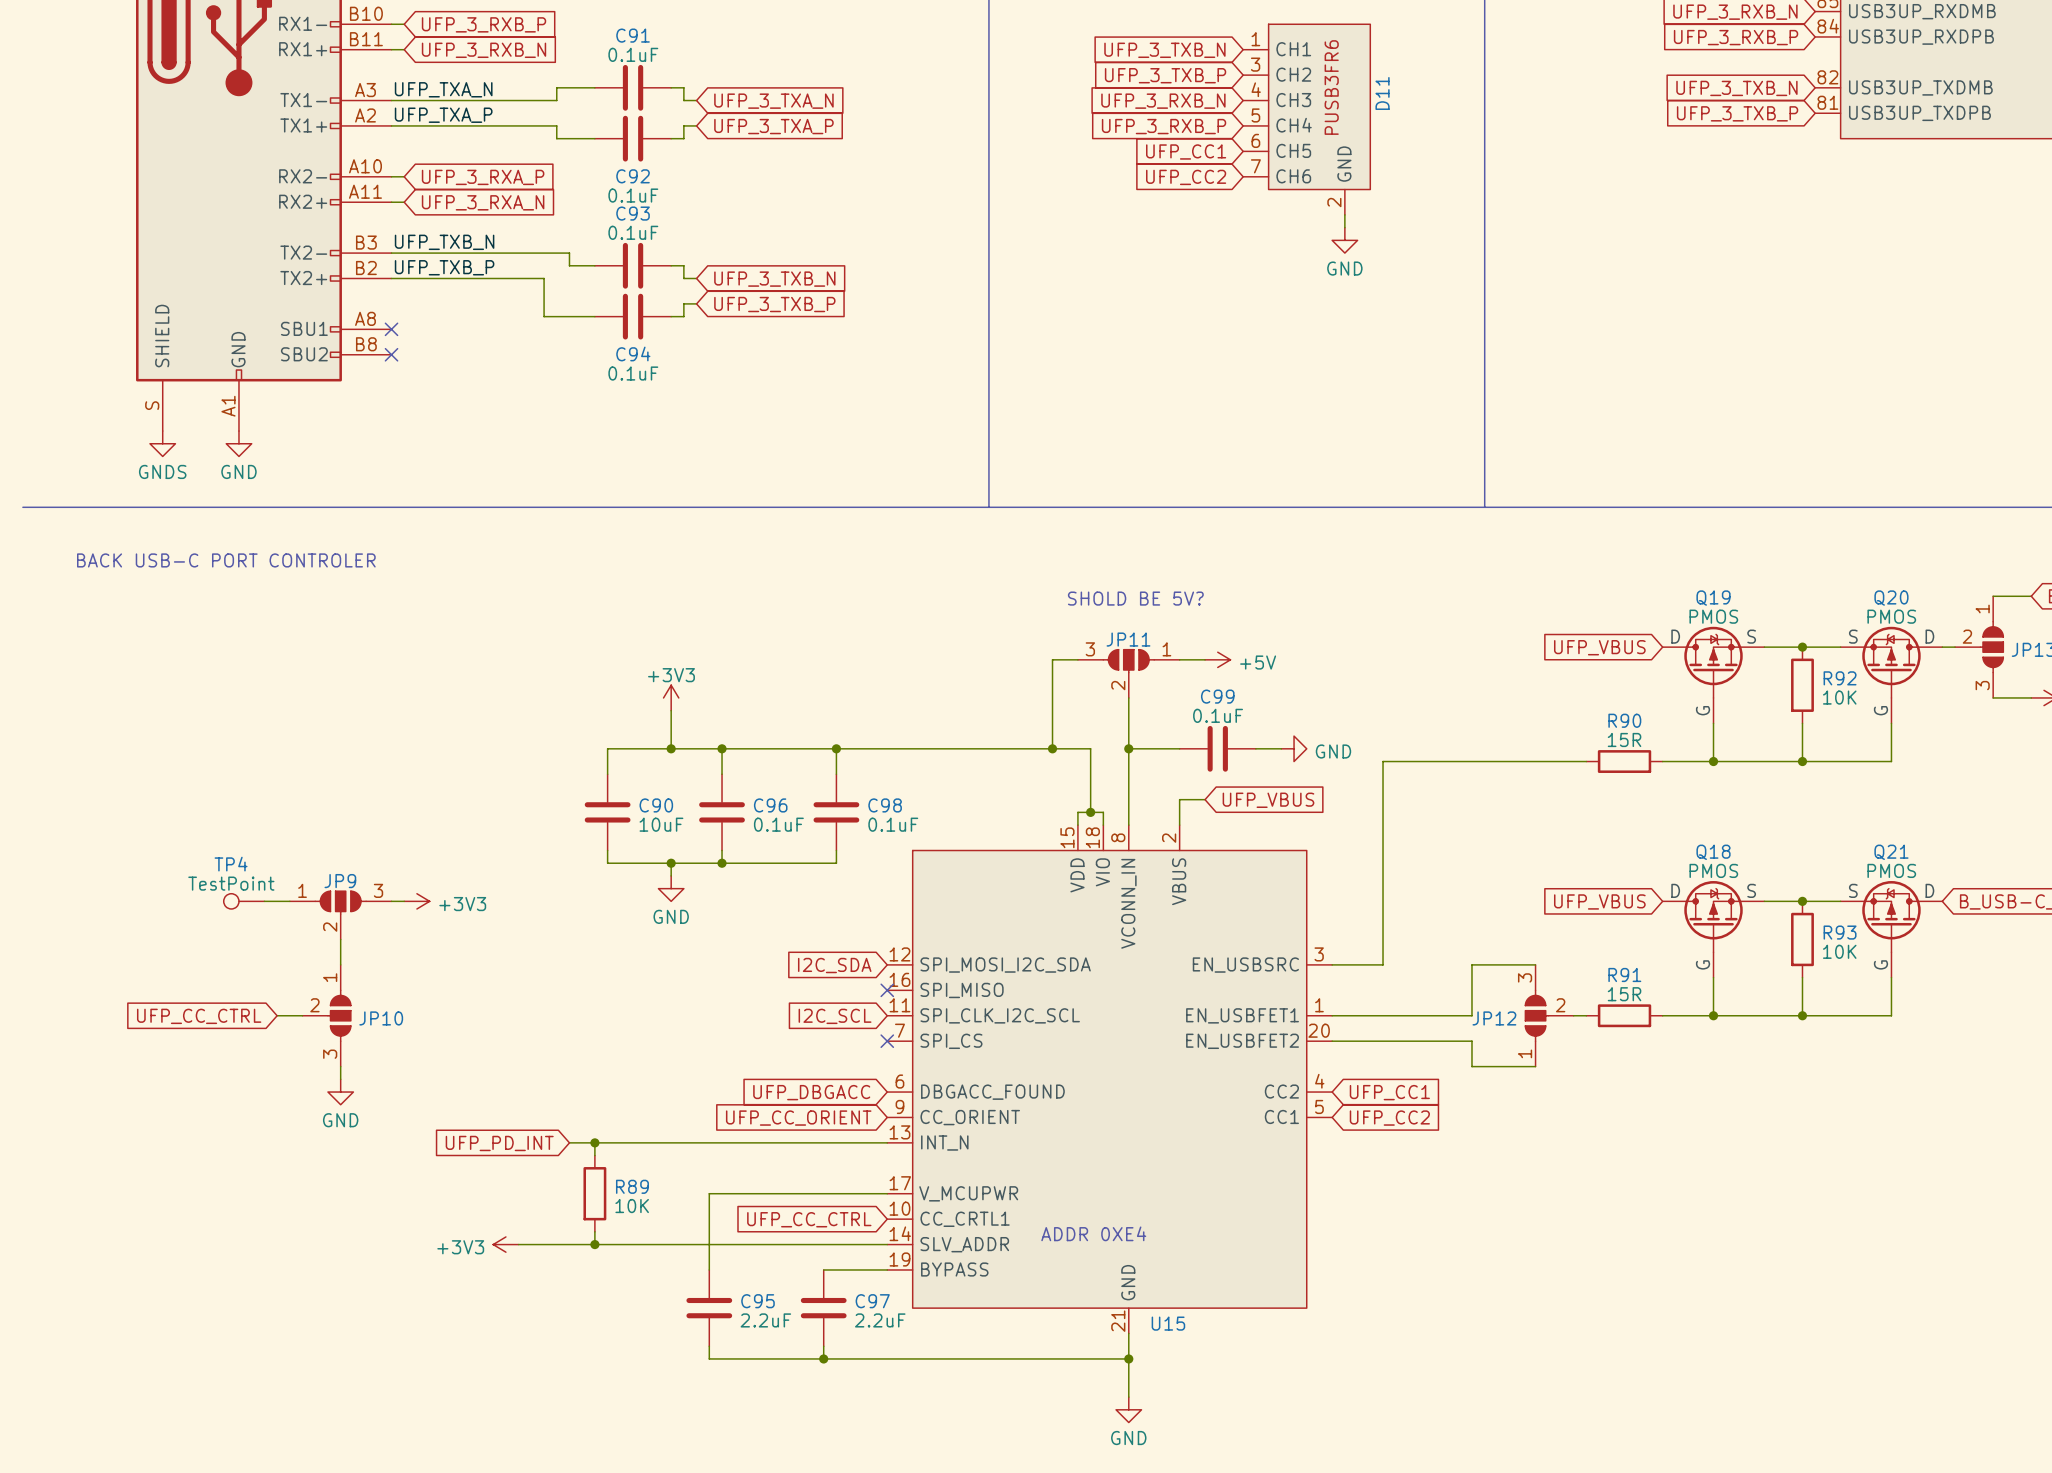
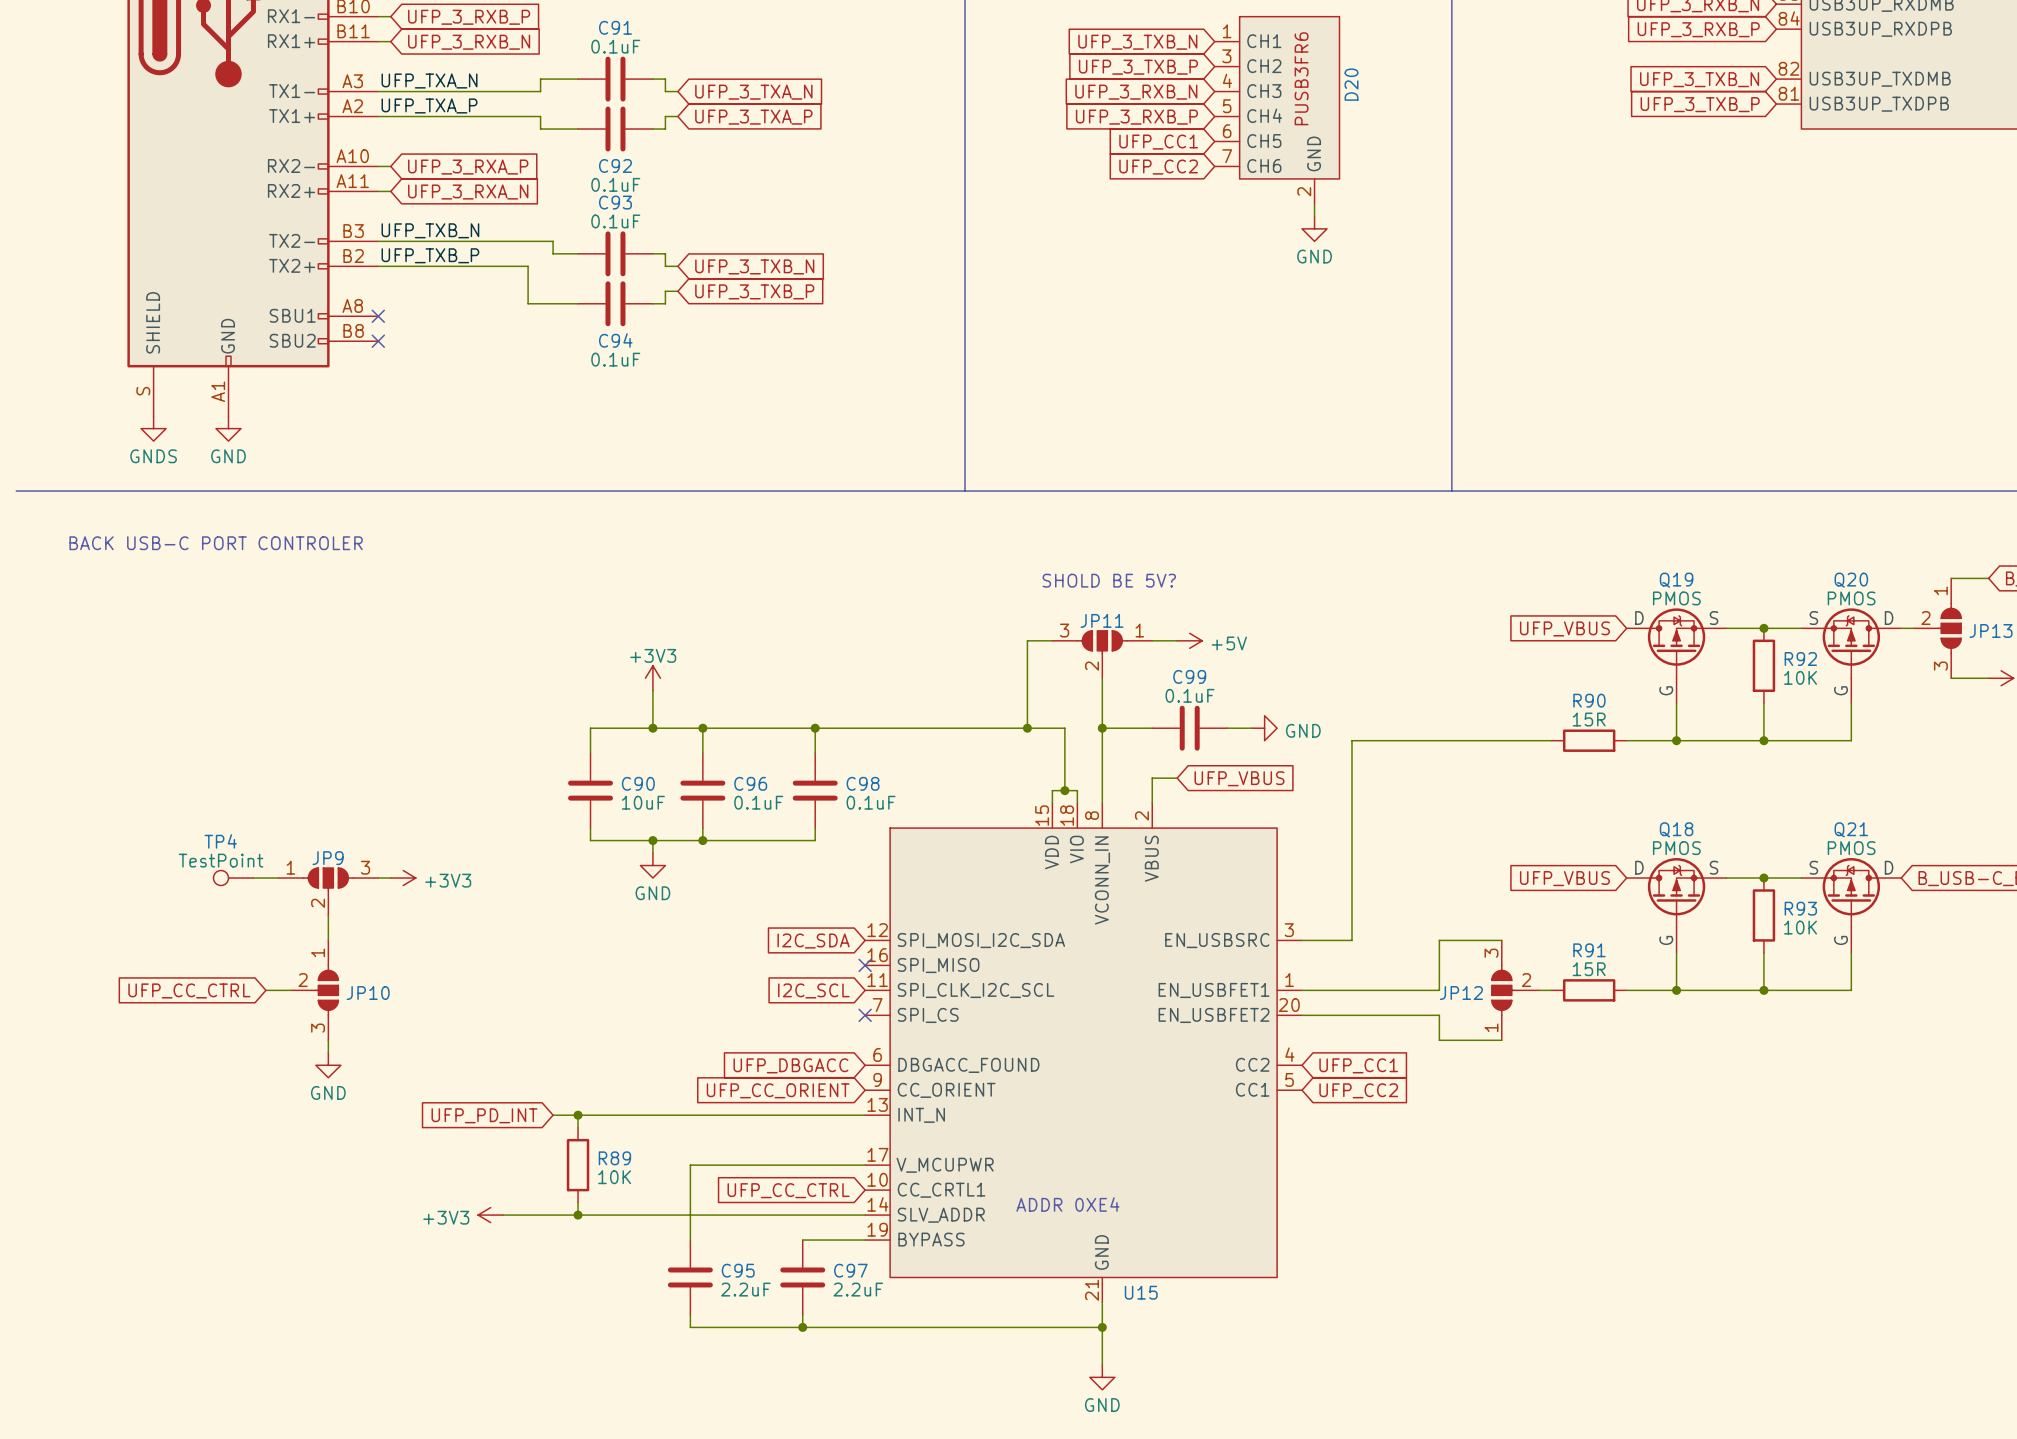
D11 name: D11 (1382, 93) -> D20 (1351, 84)

